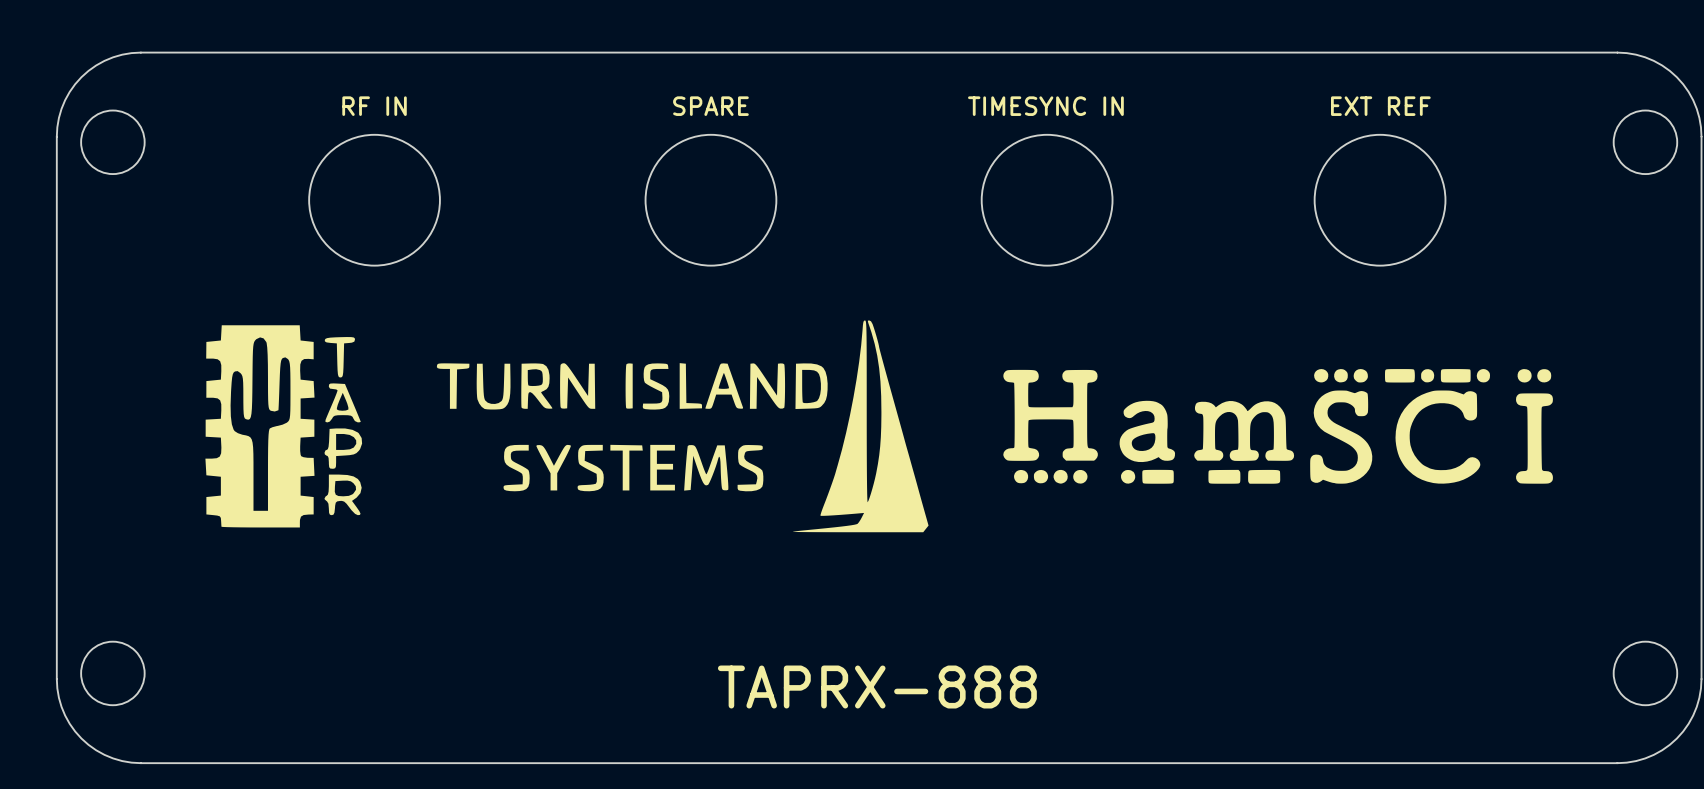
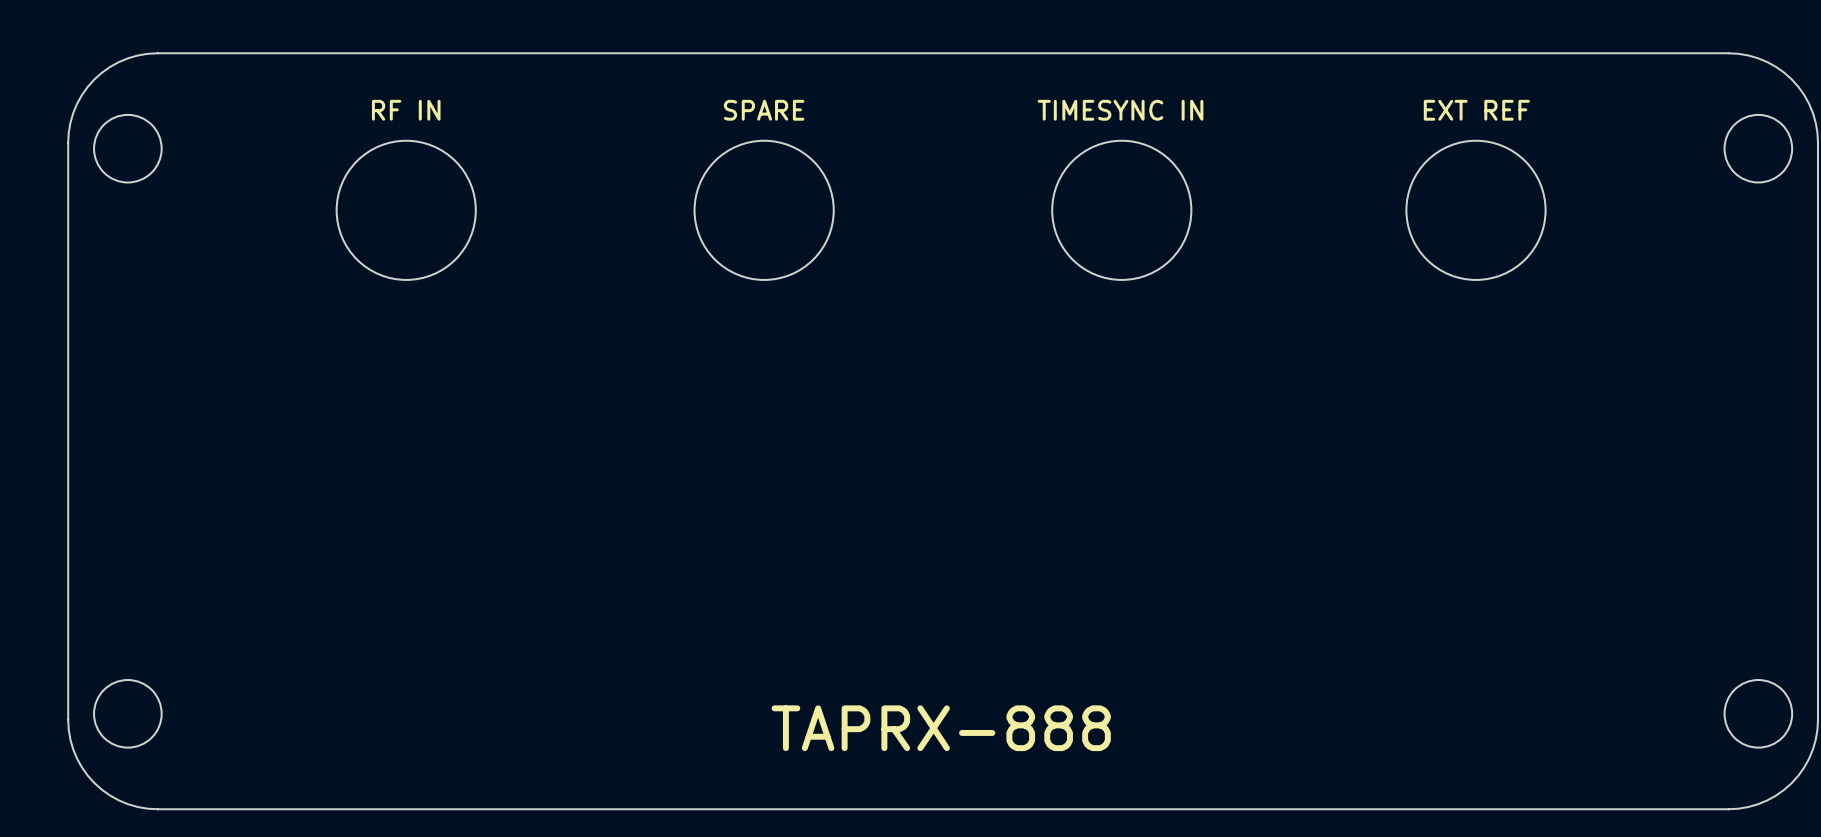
drawing: [625, 320, 929, 533] -> none
drawing: [205, 325, 363, 528] -> none
drawing: [436, 363, 596, 410] -> none
drawing: [1003, 369, 1491, 484] -> none
drawing: [1516, 369, 1553, 484] -> none
drawing: [503, 444, 764, 492] -> none

